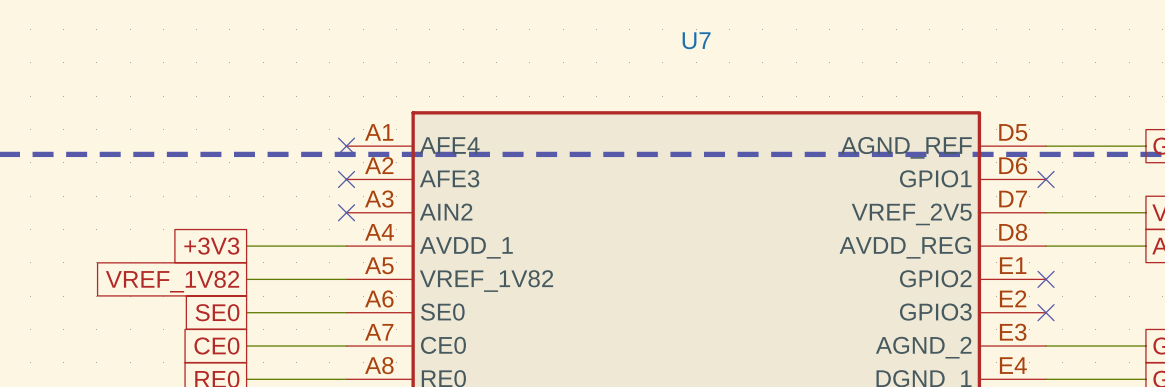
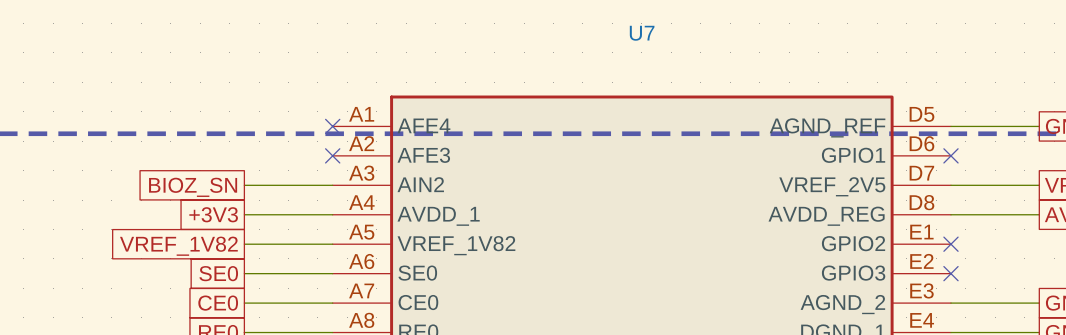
wire: none -> (244, 185) (332, 185)
no-connect mark: (346, 212) -> none
global label: none -> BIOZ_SN (193, 187)

